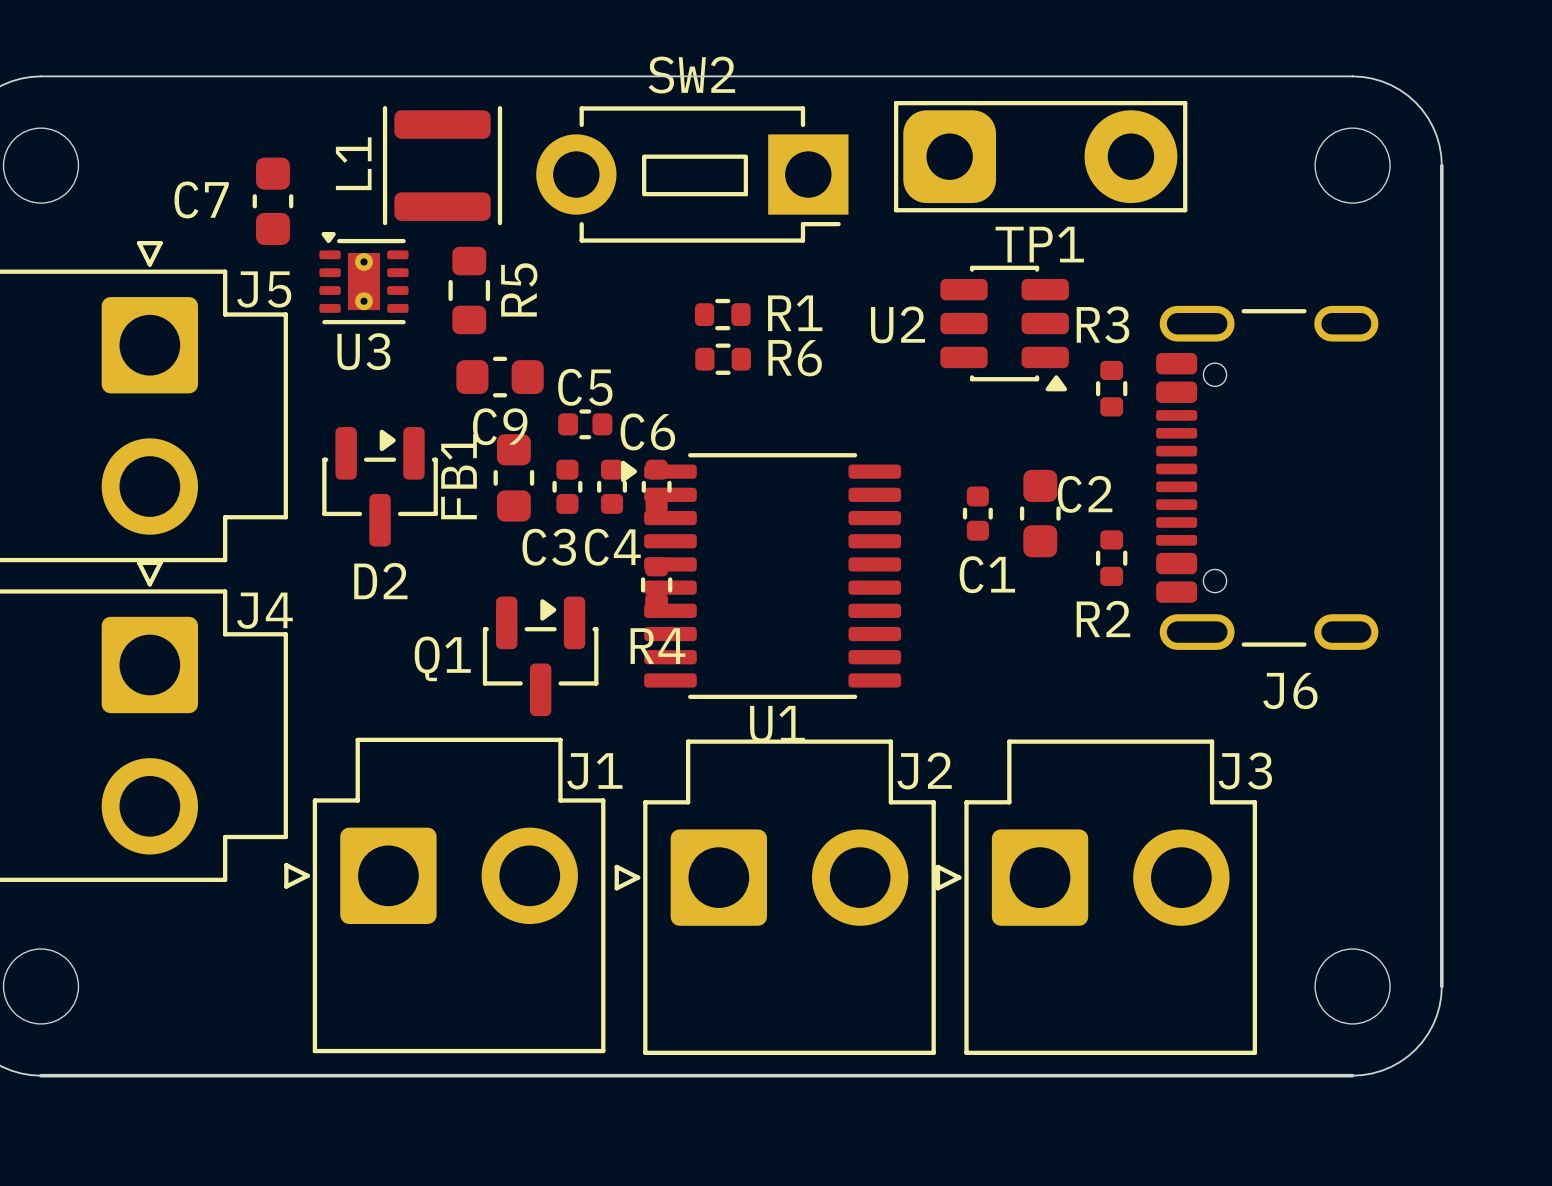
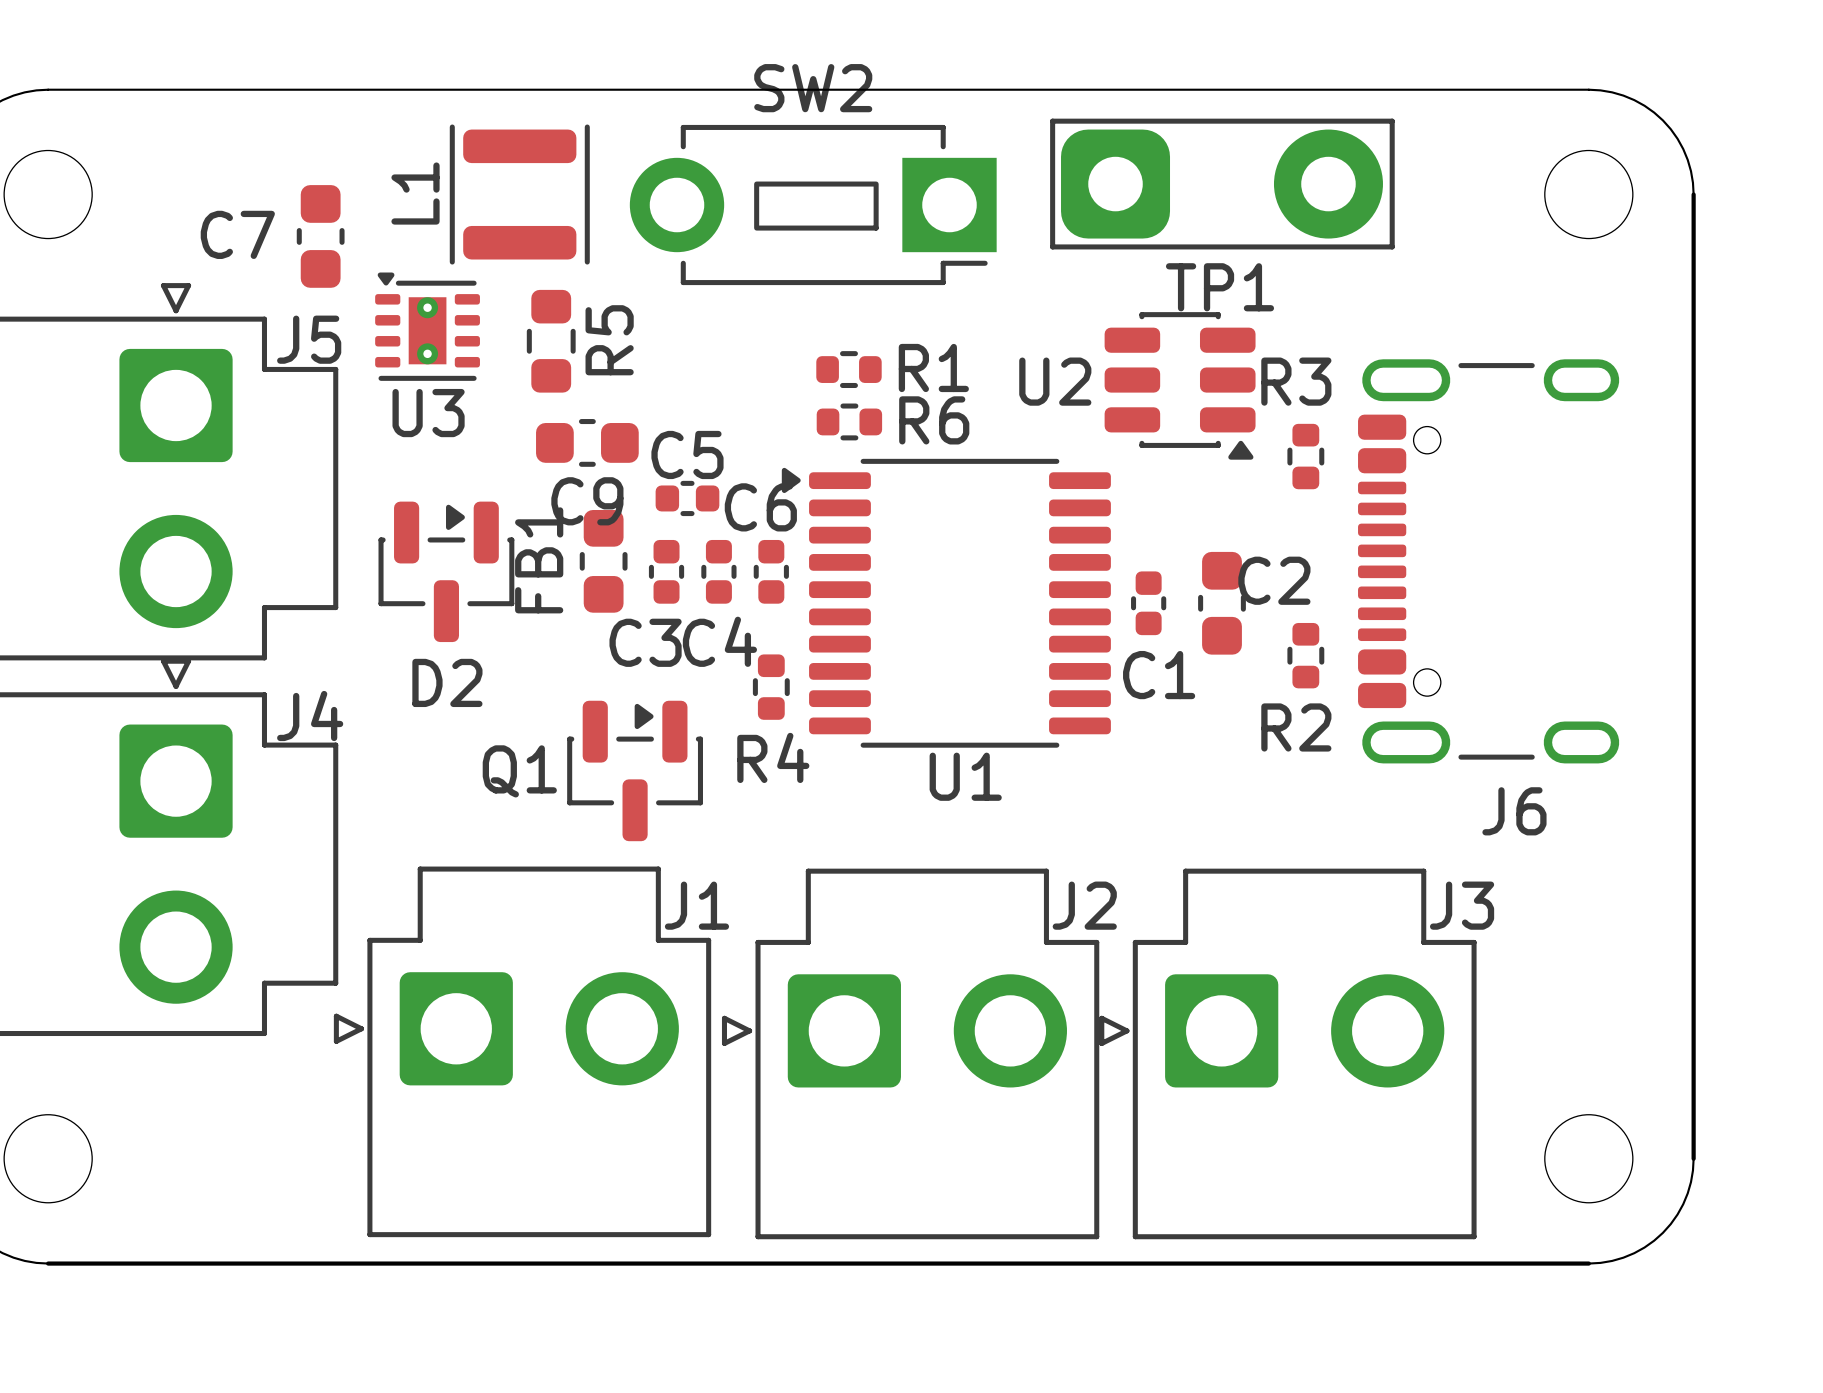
U1 position: (761, 576) -> (946, 603)

